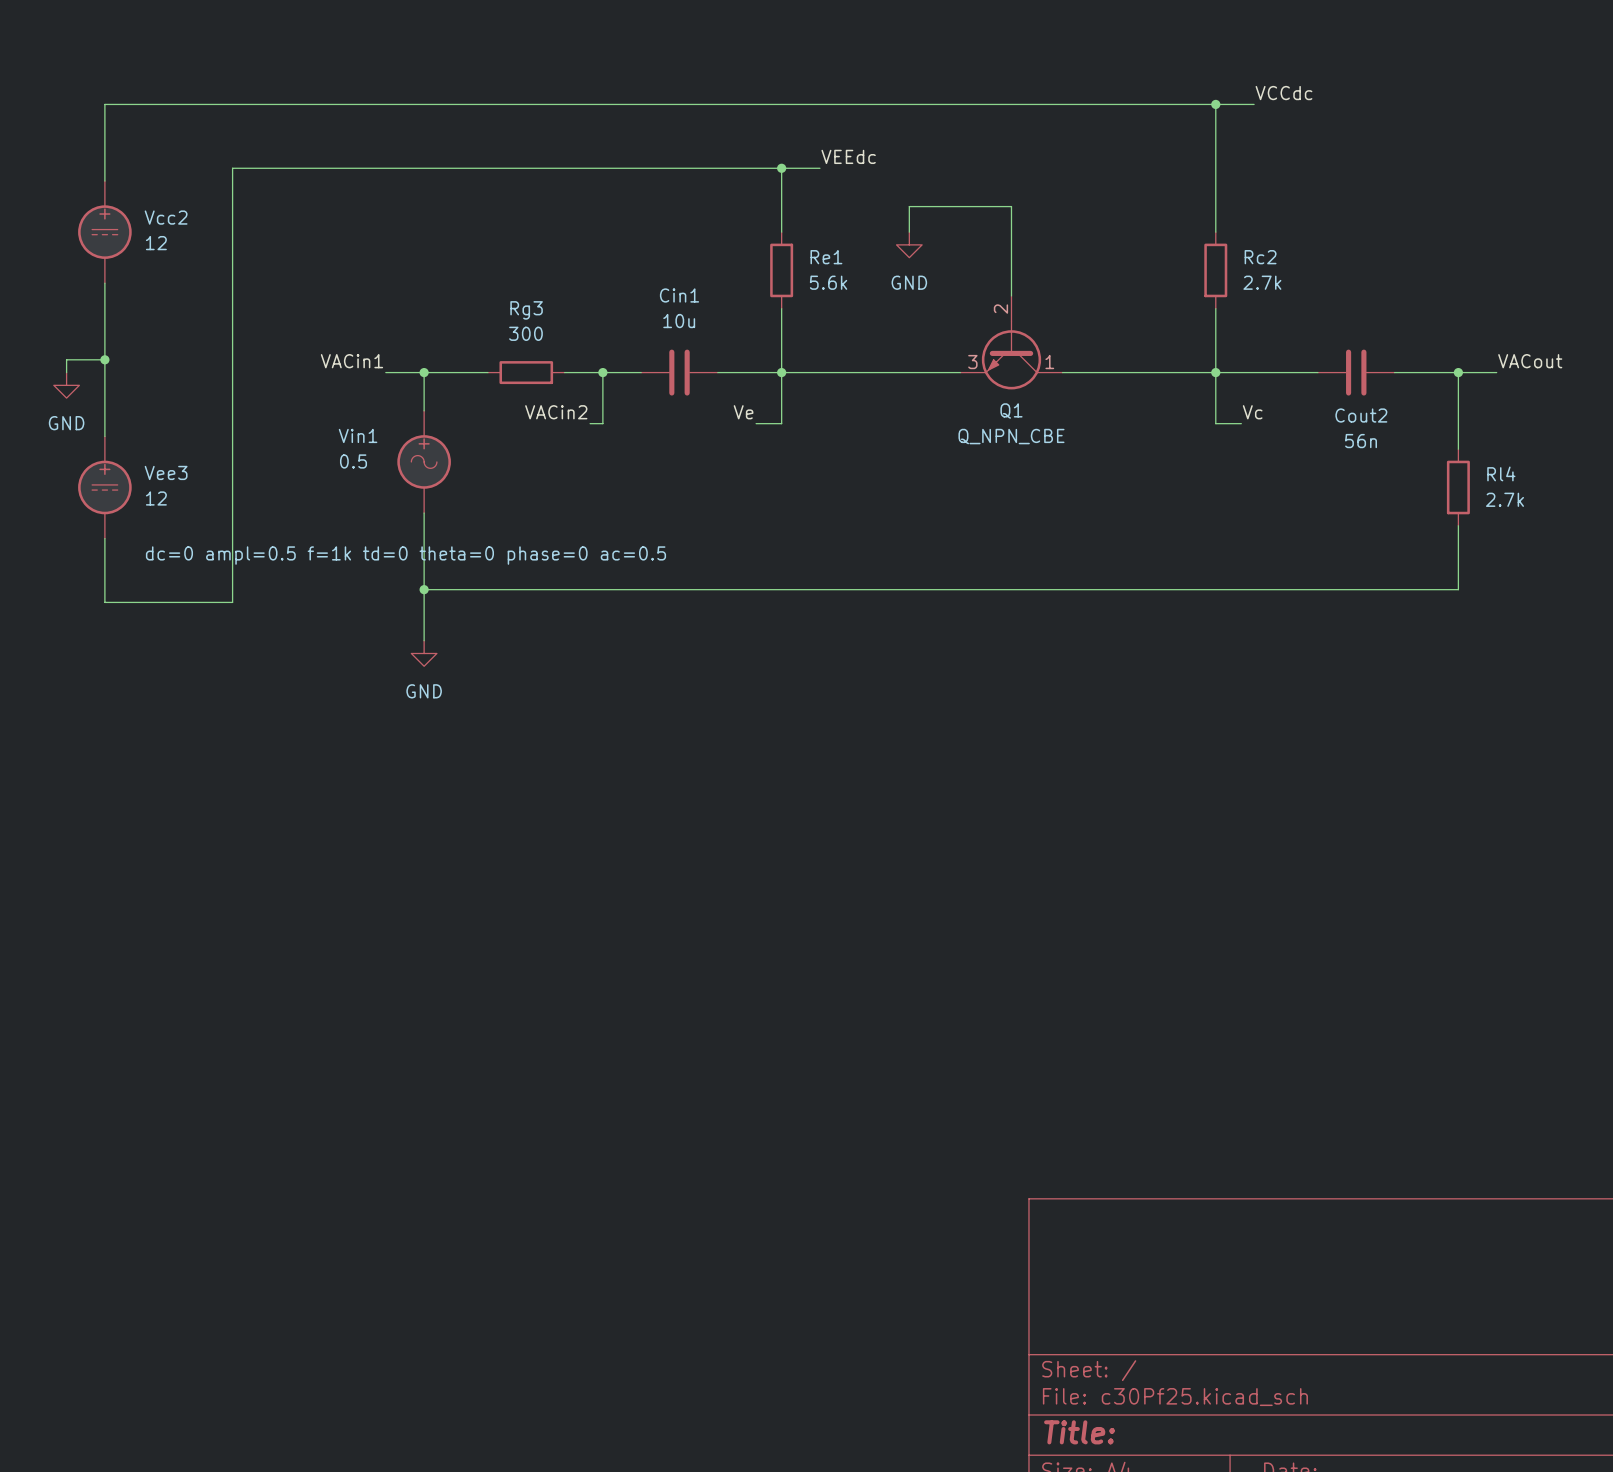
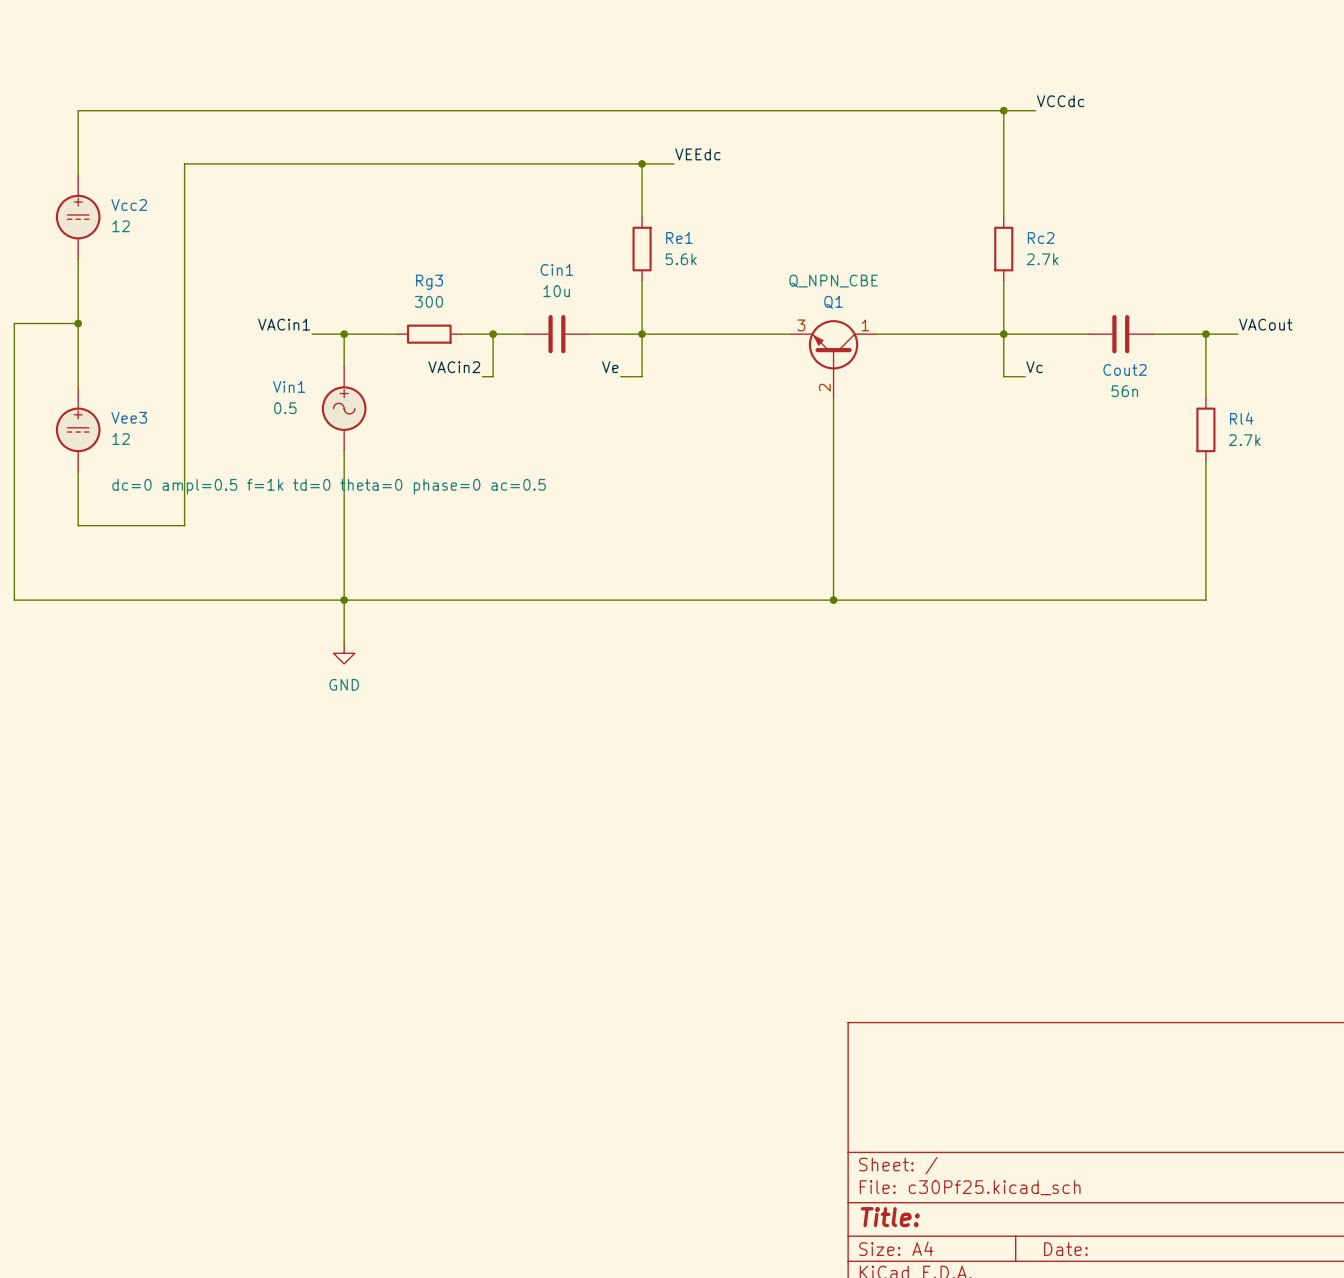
wire: (909, 232) (909, 206) (1011, 206) (1011, 295) -> none
power symbol: GND (909, 244) -> none
Q1 flip: as is (1011, 355) -> up-down (833, 348)
wire: (66, 359) (66, 372) -> none
power symbol: GND (66, 385) -> none
wire: none -> (833, 397) (833, 600)
wire: (424, 589) (1458, 589) -> (46, 323) (14, 323) (14, 600) (1205, 600) (1205, 515)
junction: (424, 589) -> none
wire: none -> (344, 557) (344, 642)
power symbol position: GND (424, 653) -> GND (344, 653)
junction: none -> (344, 600)
junction: none -> (833, 600)

